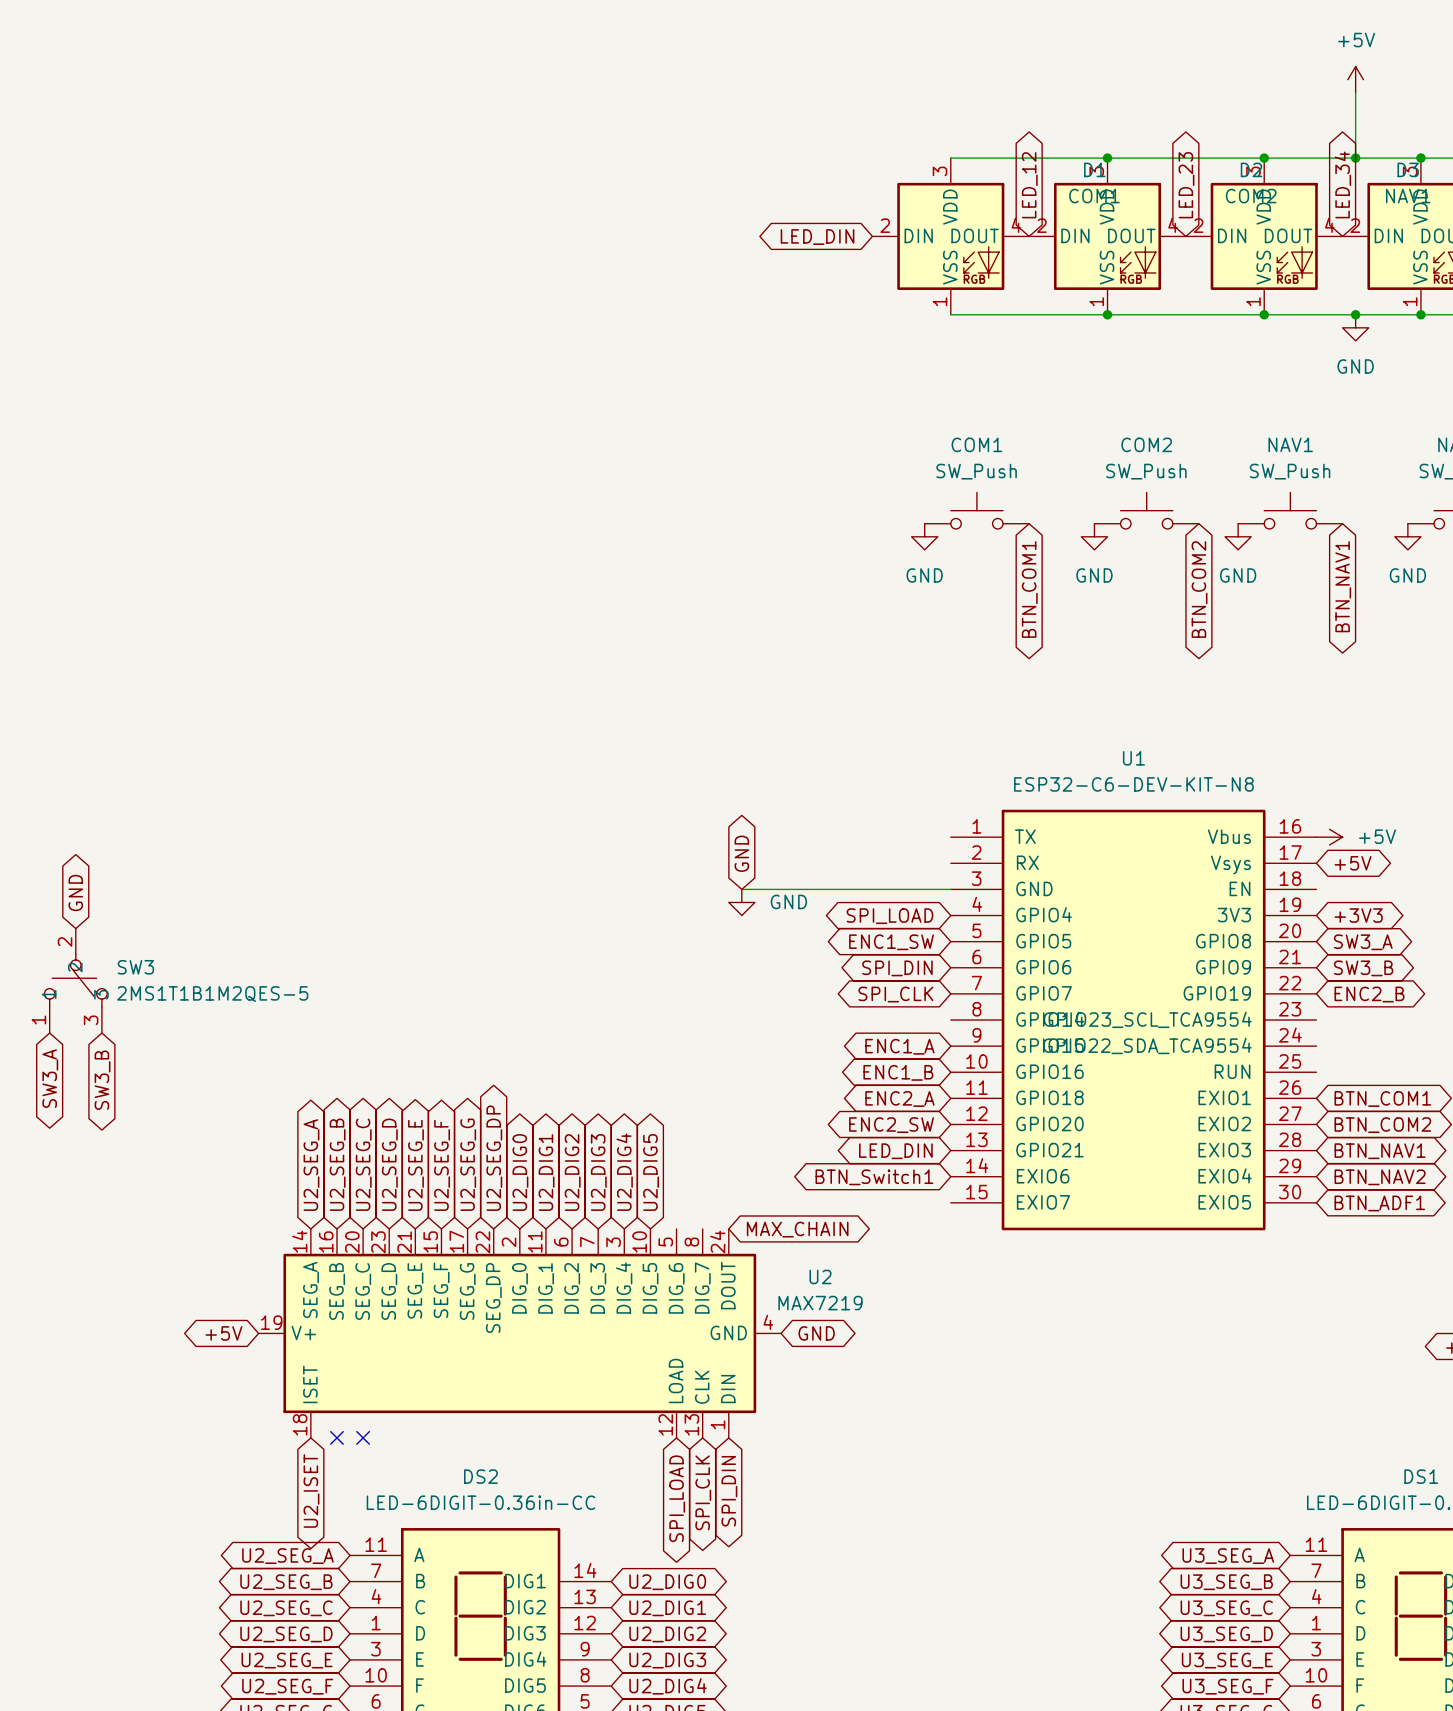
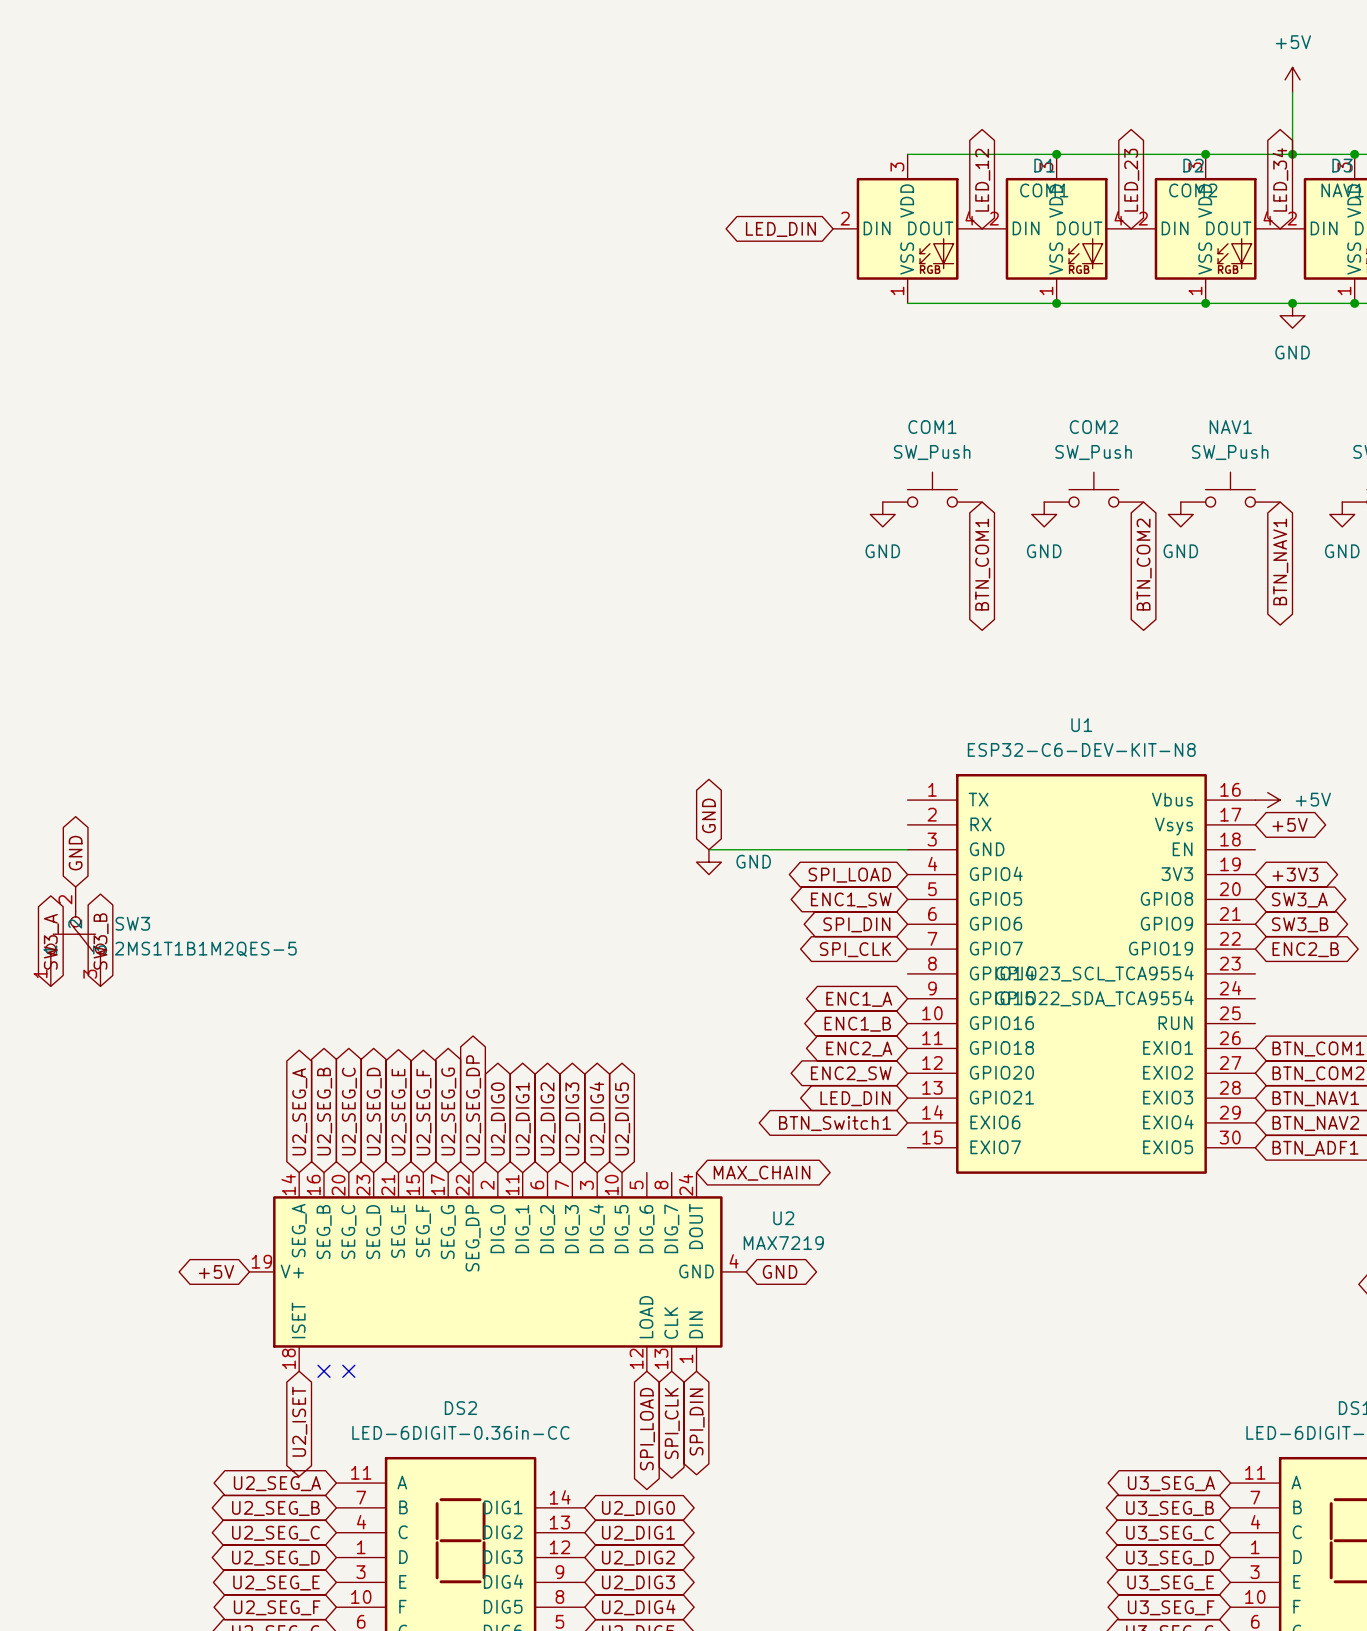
global label rotation: 0° (50, 1078) -> 180° (51, 941)
global label position: SW3_A (50, 1078) -> SW3_A (51, 941)
global label rotation: 0° (102, 1080) -> 180° (101, 941)
global label position: SW3_B (102, 1080) -> SW3_B (101, 941)

